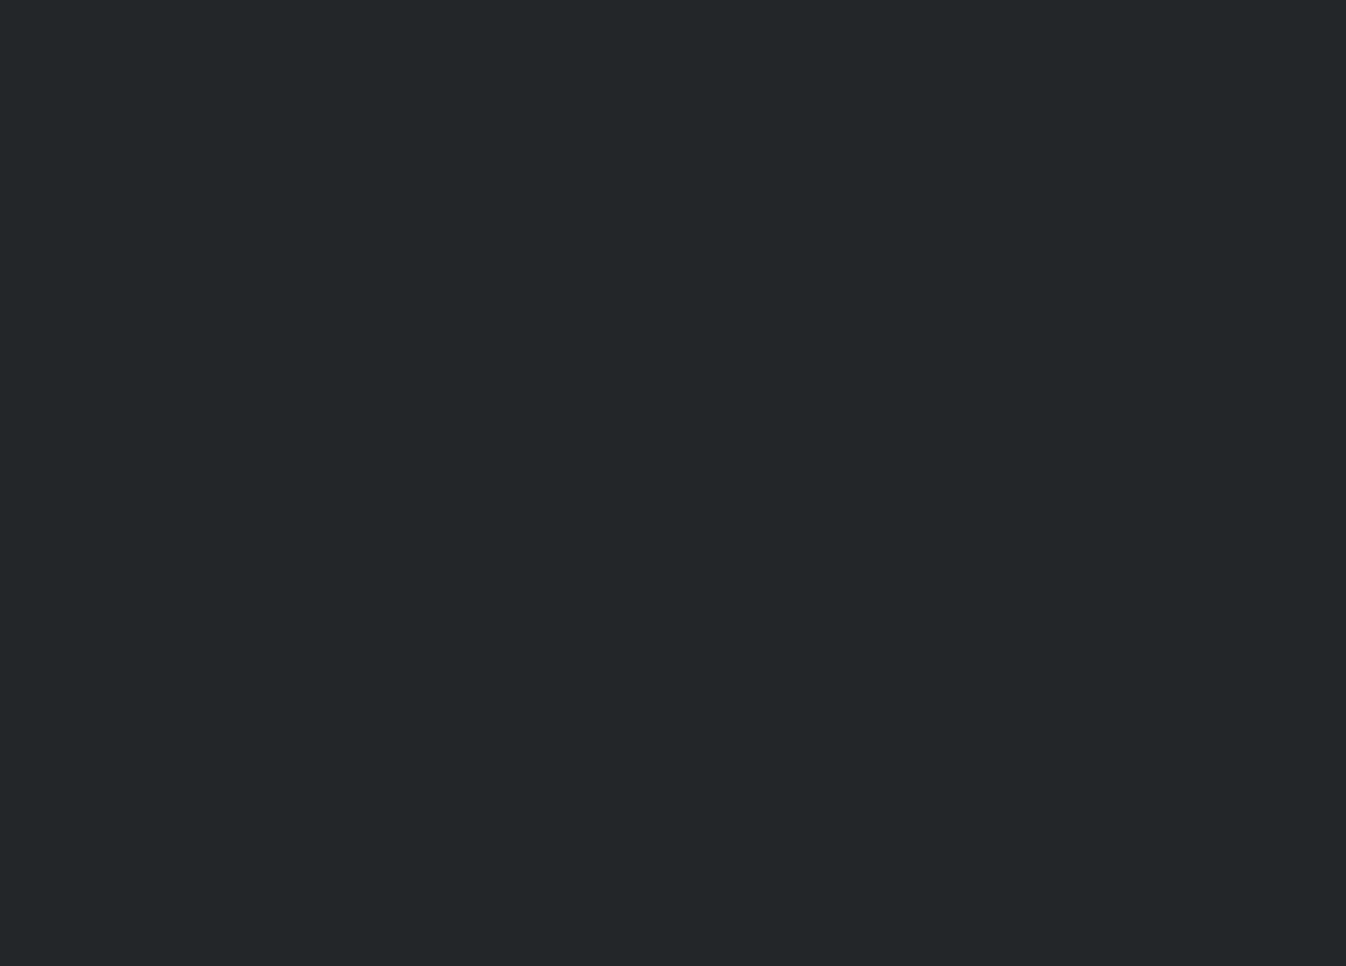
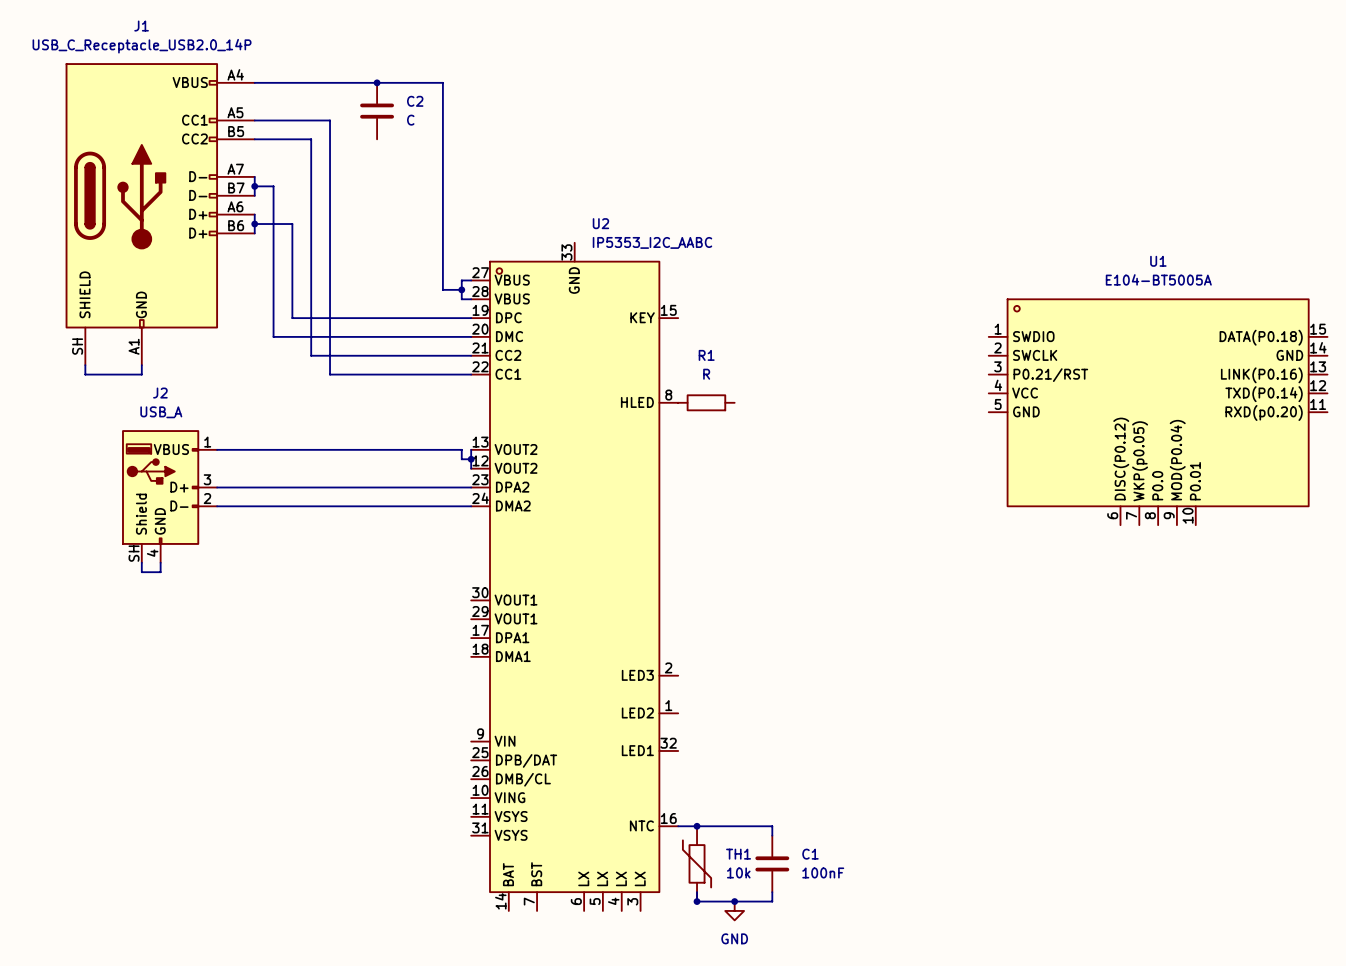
wire: none -> (254, 82) (442, 82) (442, 289) (461, 289)
junction: none -> (377, 82)
C2: none -> C (377, 111)
wire: none -> (254, 120) (330, 120) (330, 374) (471, 374)
wire: none -> (254, 139) (311, 139) (311, 355) (471, 355)
wire: none -> (254, 176) (254, 195)
wire: none -> (254, 186) (273, 186) (273, 336) (471, 336)
junction: none -> (254, 186)
J1: none -> USB_C_Receptacle_USB2.0_14P (160, 214)
wire: none -> (254, 214) (254, 233)
wire: none -> (254, 224) (292, 224) (292, 318) (471, 318)
junction: none -> (254, 224)
wire: none -> (471, 280) (461, 280) (461, 299) (471, 299)
junction: none -> (461, 289)
wire: none -> (85, 365) (85, 374) (141, 374) (141, 365)
R1: none -> R (706, 402)
U1: none -> E104-BT5005A (1158, 412)
wire: none -> (217, 449) (461, 449) (461, 459) (471, 459)
wire: none -> (471, 449) (471, 468)
junction: none -> (471, 459)
wire: none -> (217, 487) (471, 487)
J2: none -> USB_A (169, 496)
wire: none -> (217, 506) (471, 506)
wire: none -> (141, 562) (141, 572) (160, 572) (160, 562)
U2: none -> IP5353_I2C_AABC (574, 576)
wire: none -> (678, 826) (772, 826) (772, 835)
junction: none -> (697, 826)
TH1: none -> 10k (697, 863)
C1: none -> 100nF (772, 863)
wire: none -> (697, 892) (697, 901) (772, 901) (772, 892)
junction: none -> (697, 901)
junction: none -> (734, 901)
power symbol: none -> GND (734, 910)

